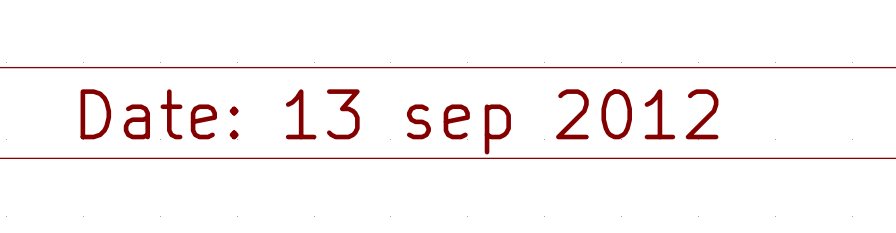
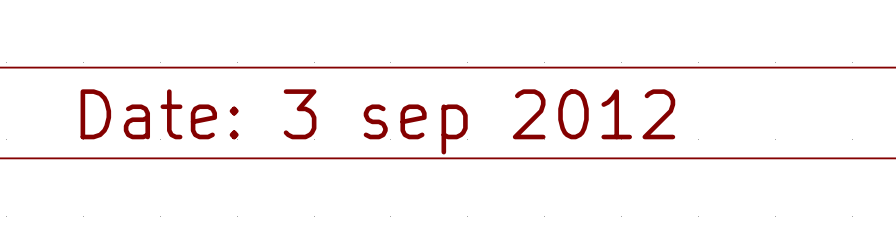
title block: Date: 13 sep 2012 (399, 121) -> Date: 3 sep 2012 (377, 121)

